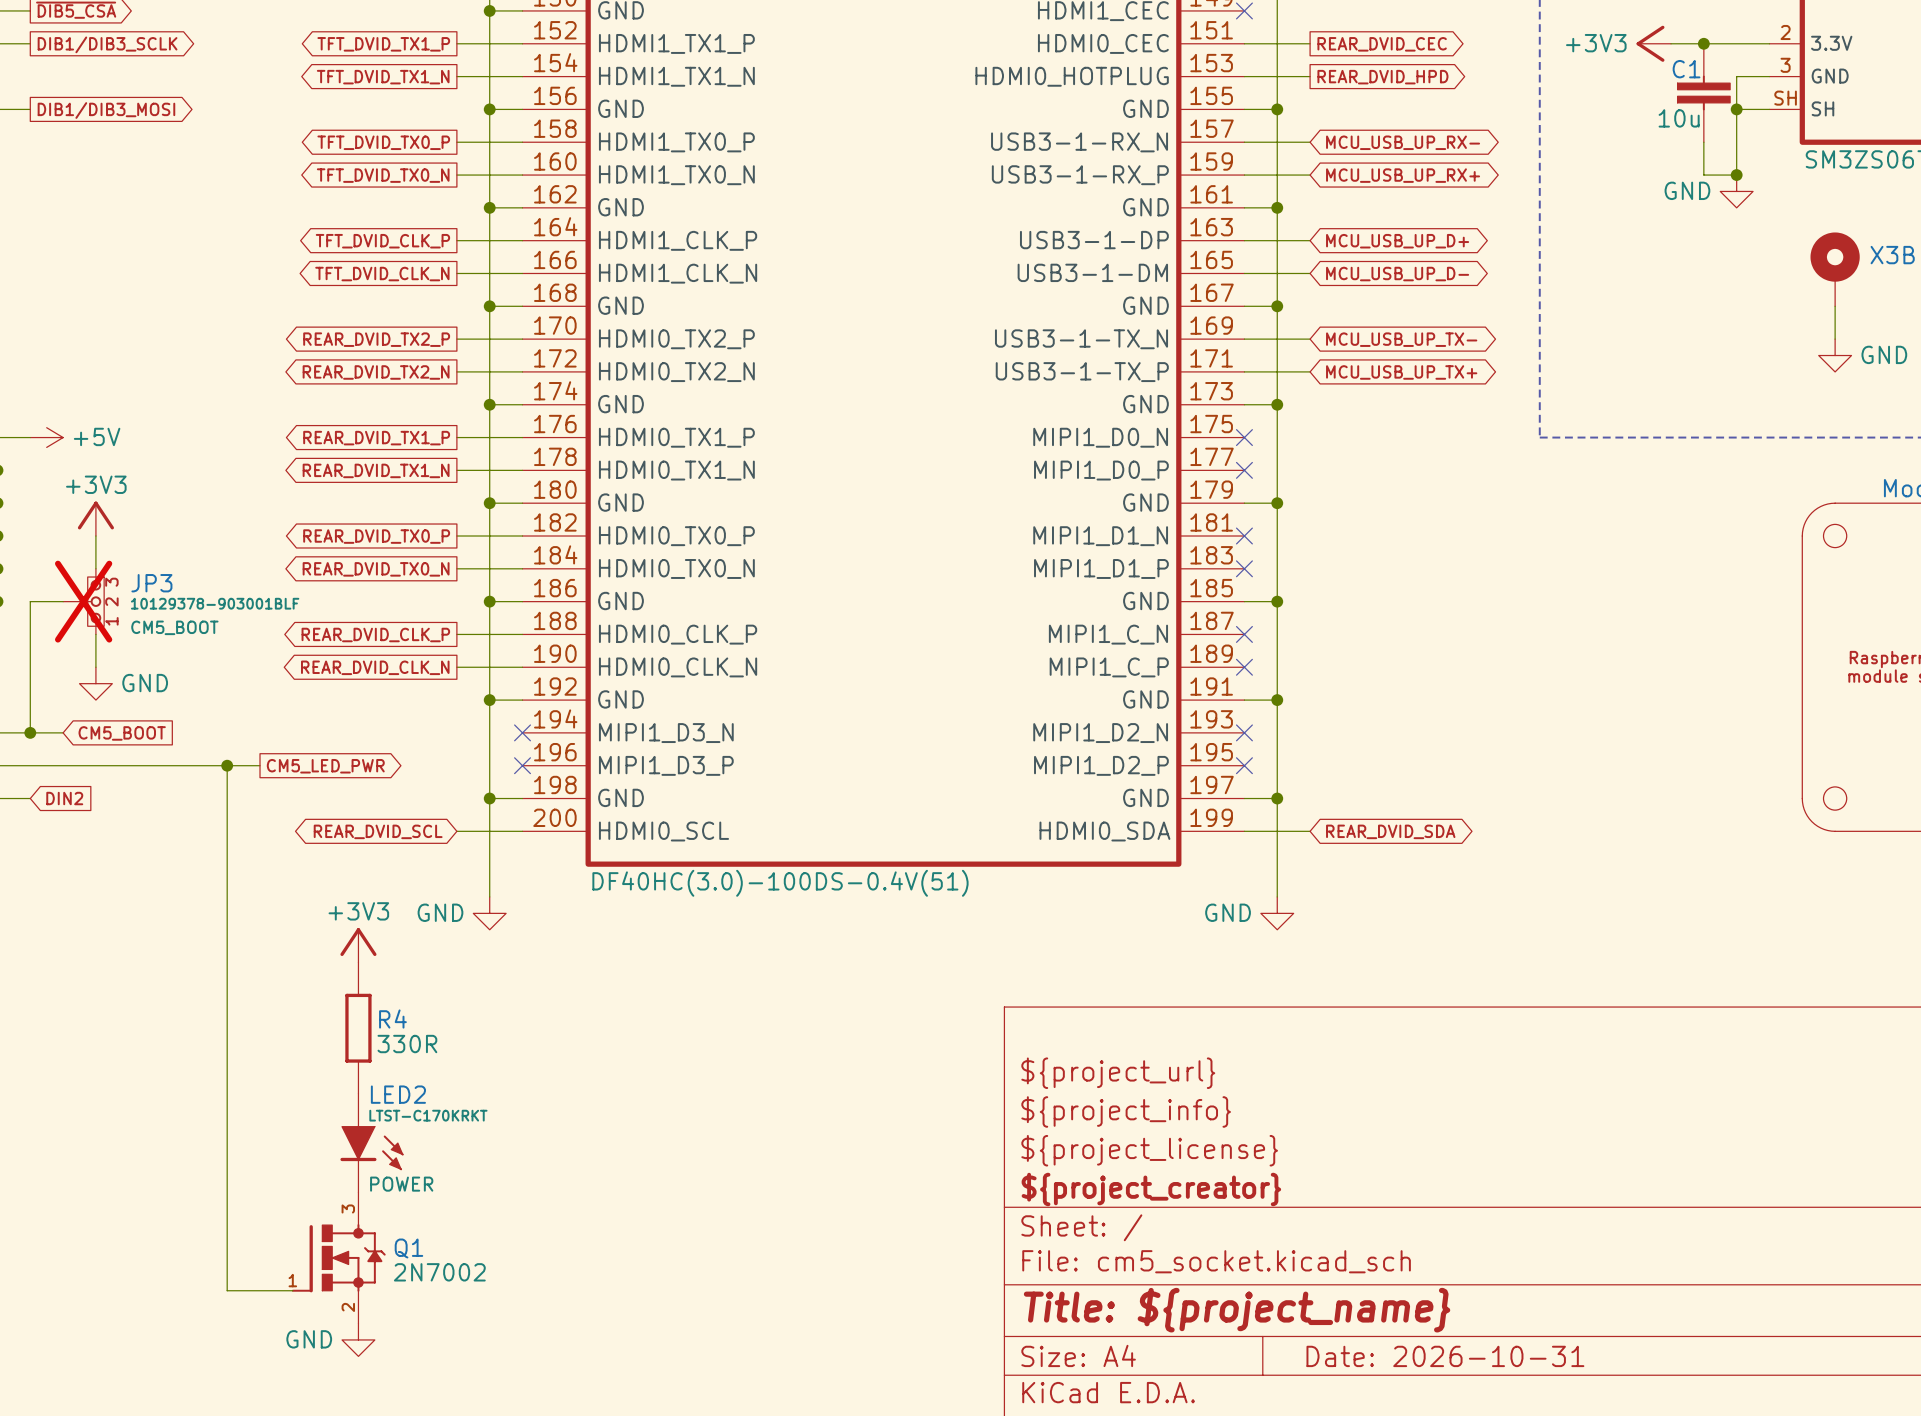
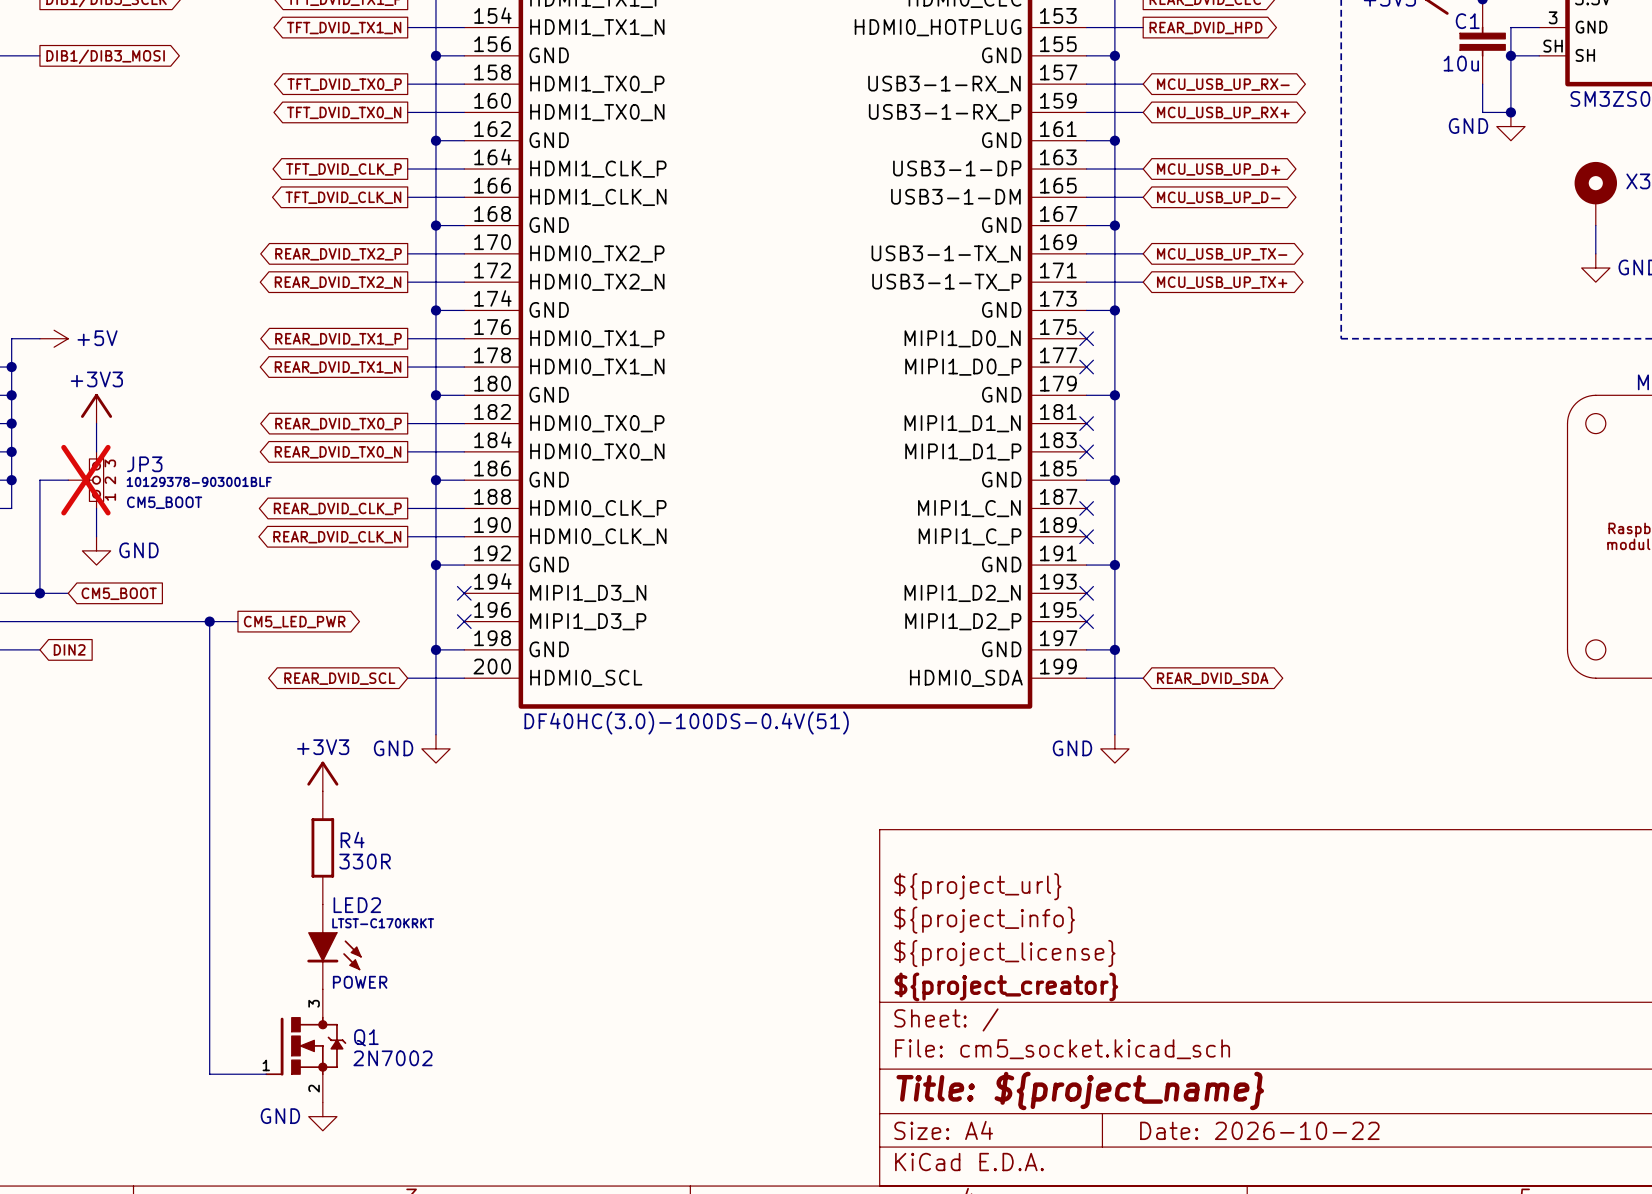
title block: Date: 2026-10-31 (1445, 1356) -> Date: 2026-10-22 (1259, 1130)

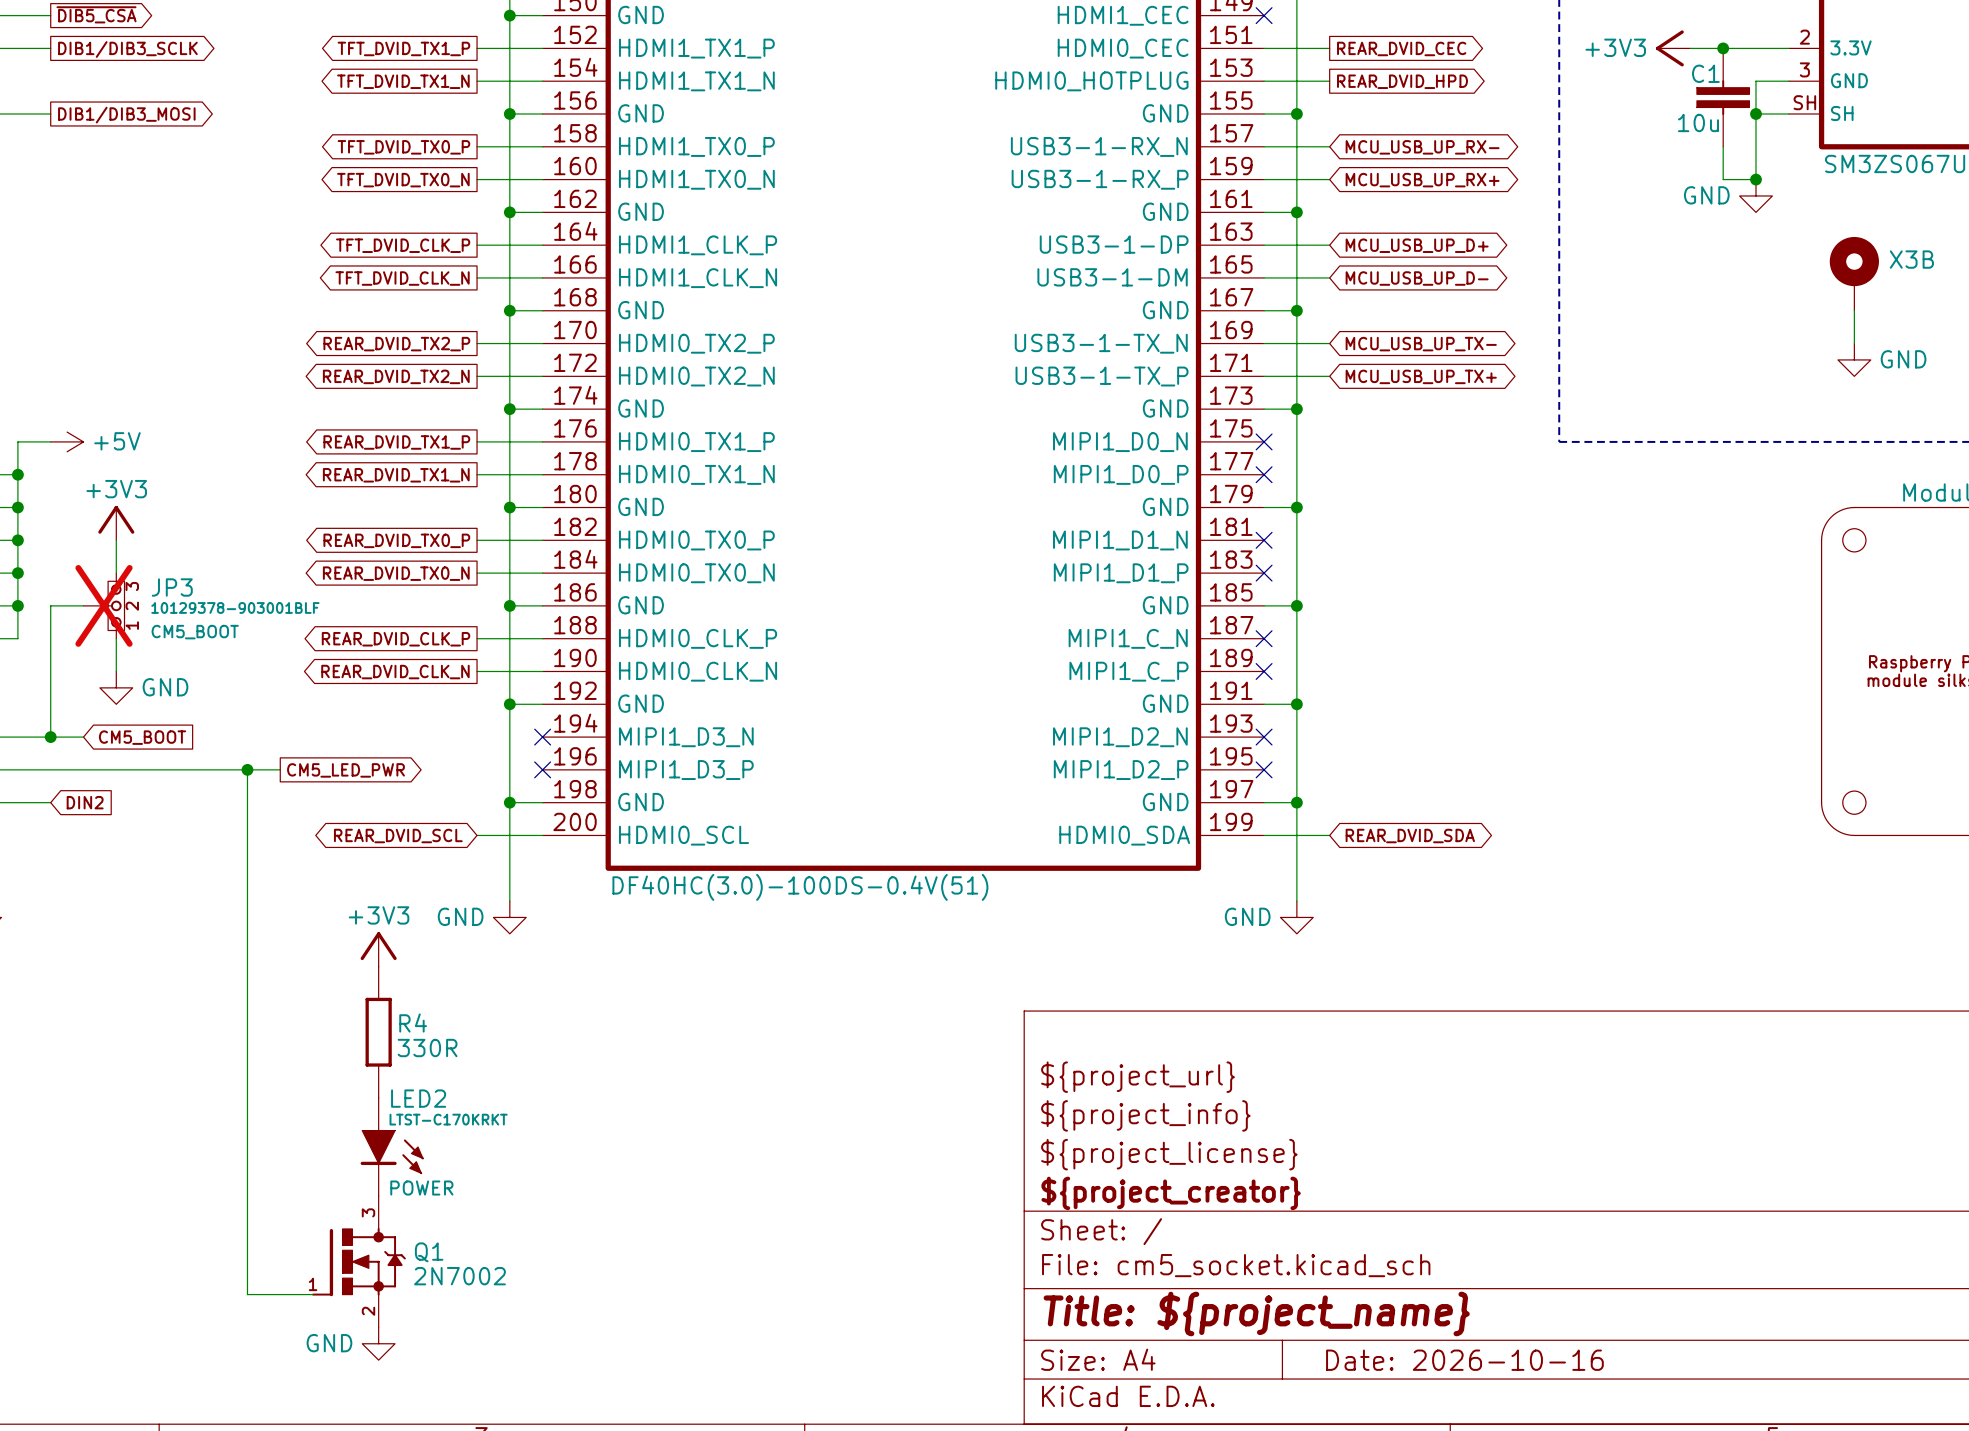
title block: Date: 2026-10-22 (1259, 1130) -> Date: 2026-10-16 (1464, 1360)

